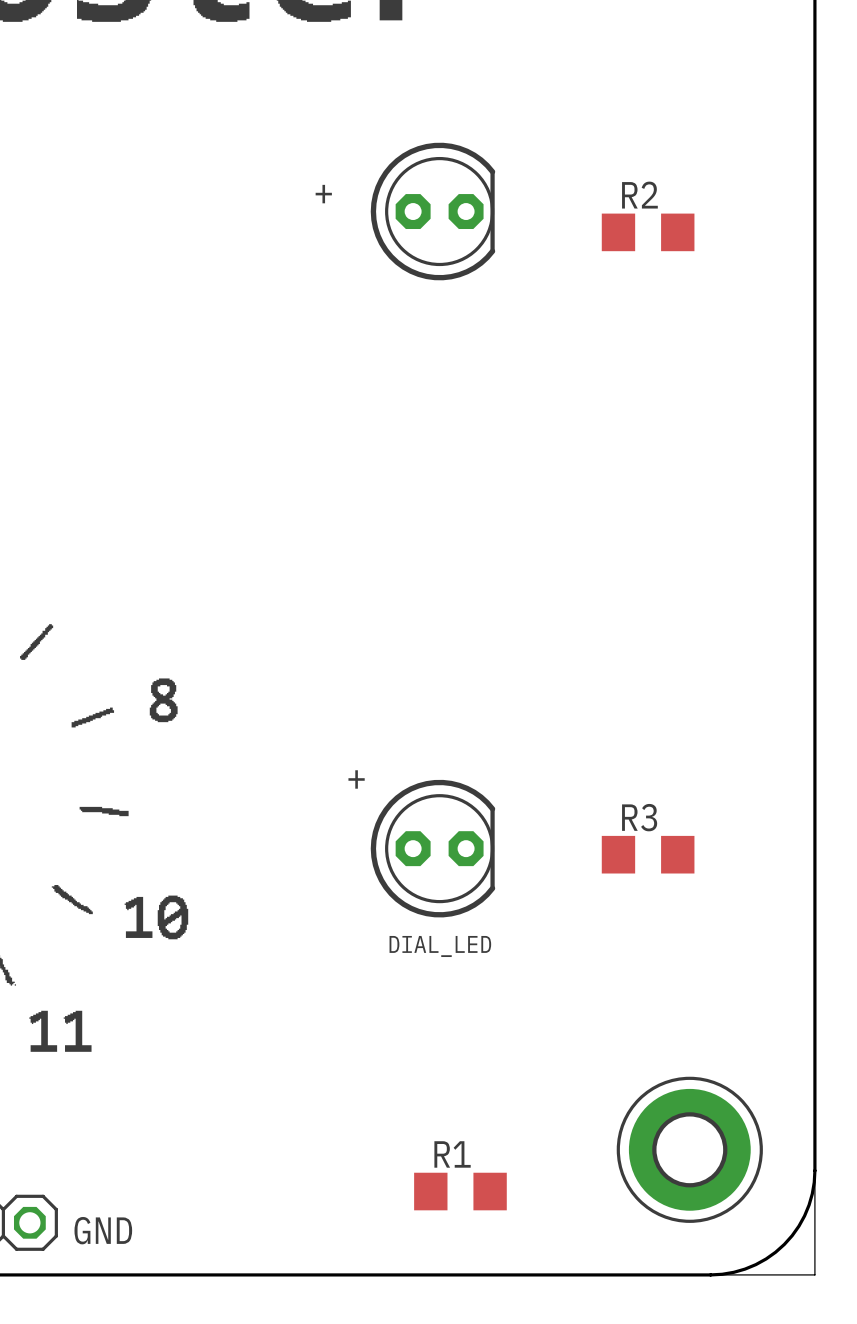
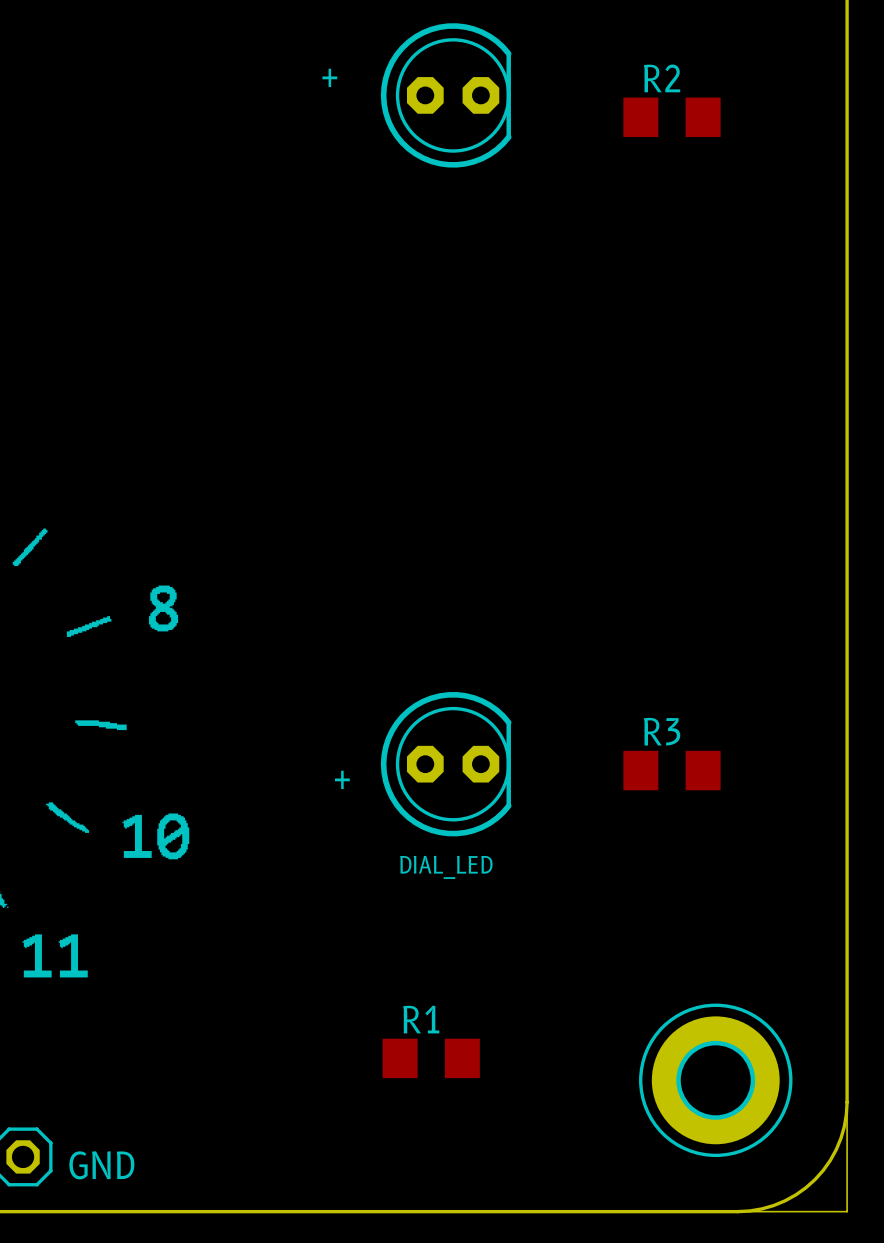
text position: + (356, 779) -> + (342, 779)
R1 position: (460, 1191) -> (431, 1058)

